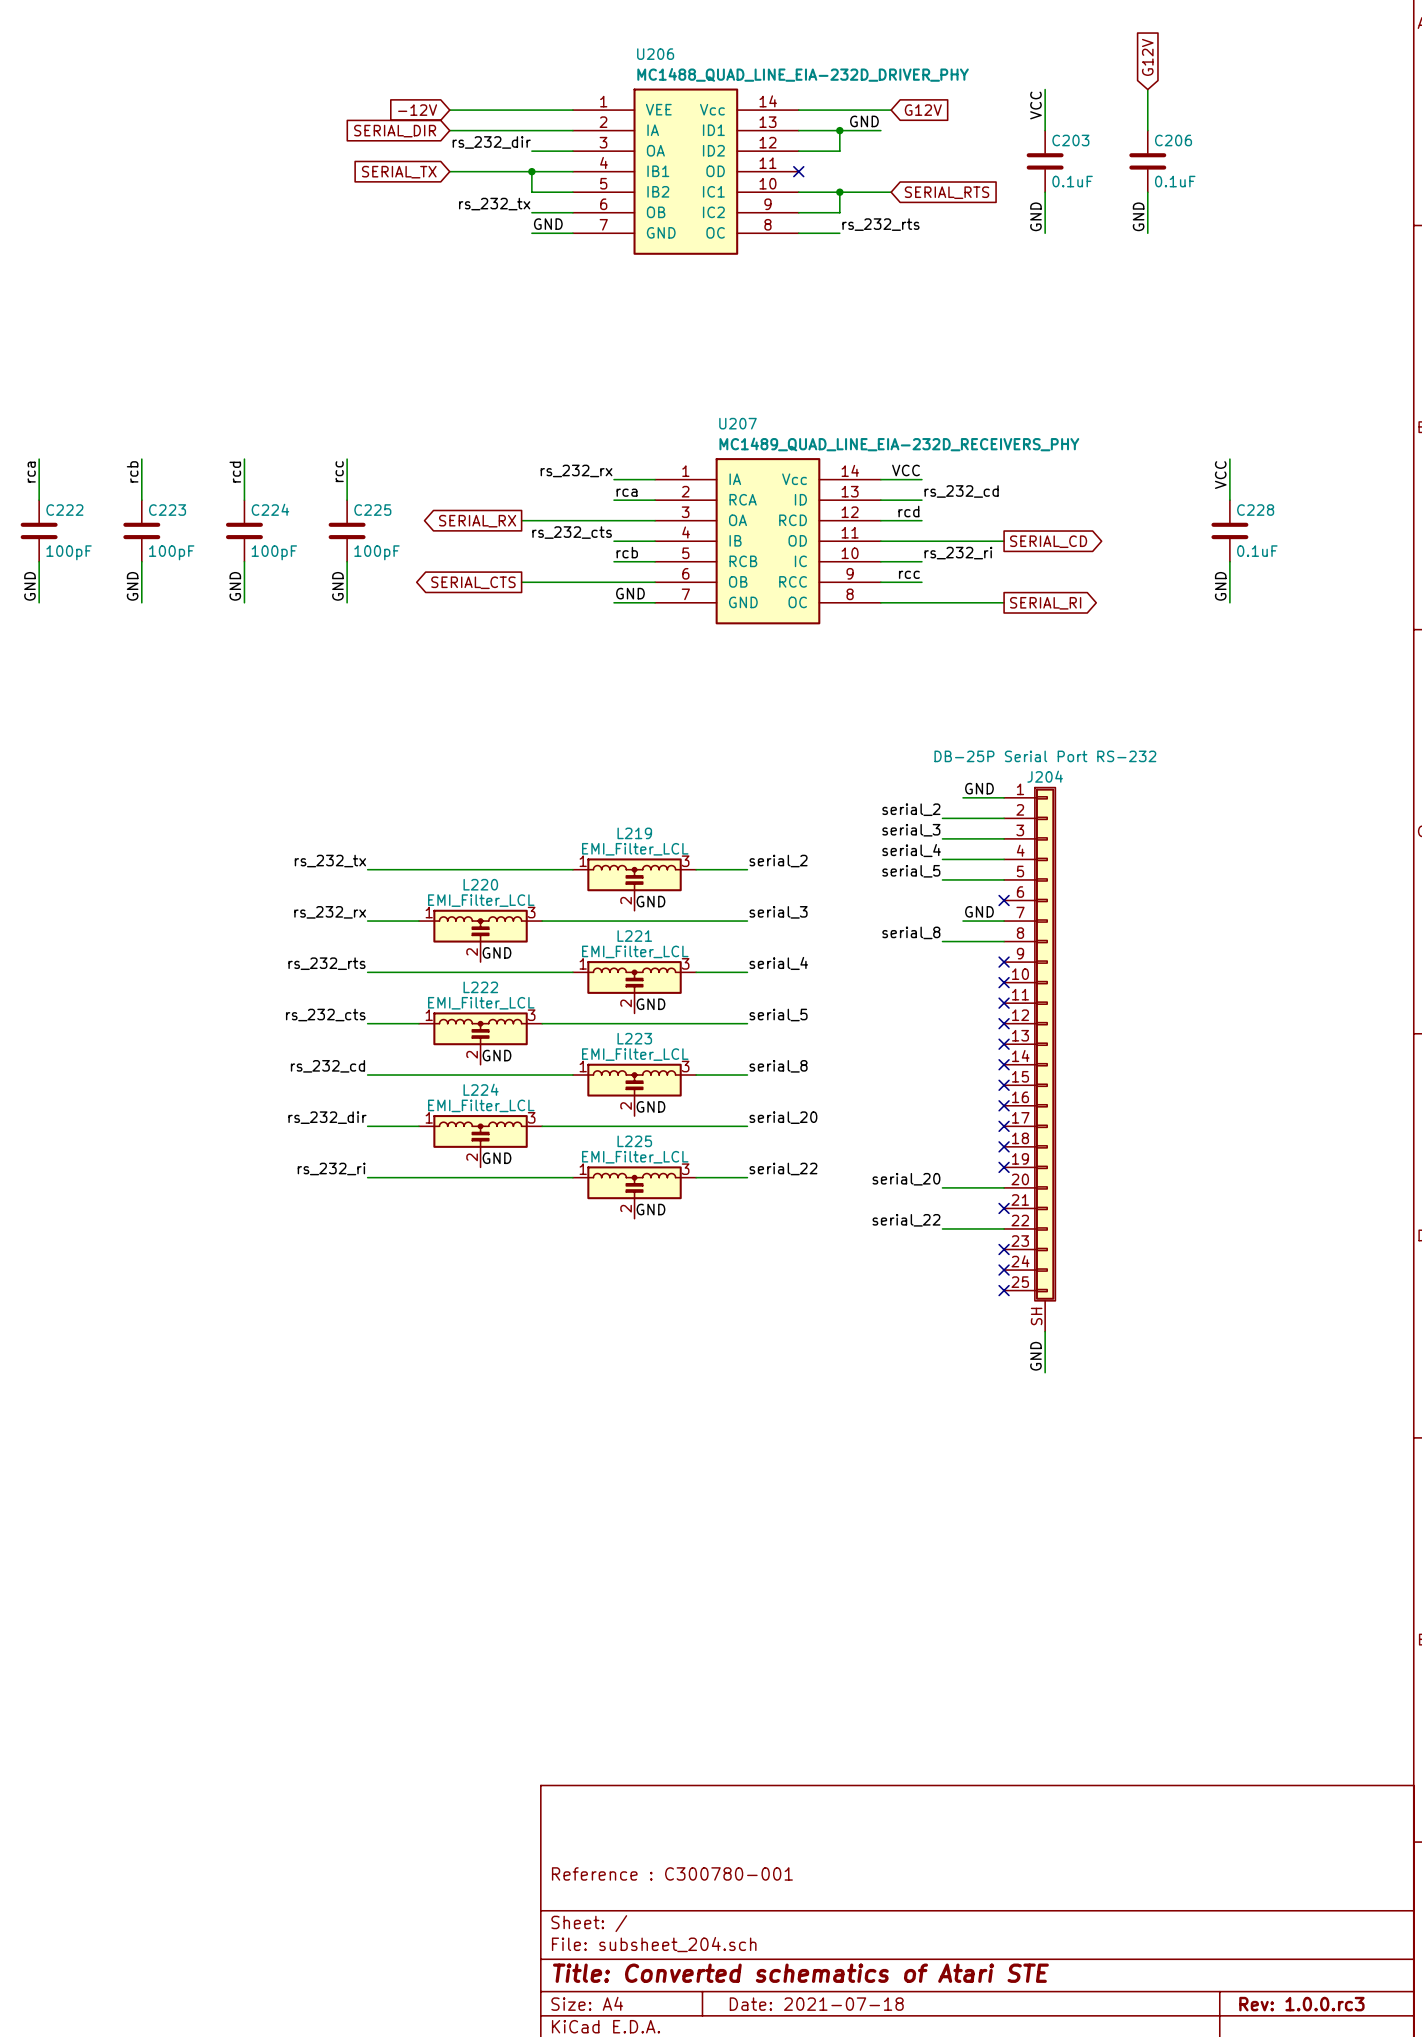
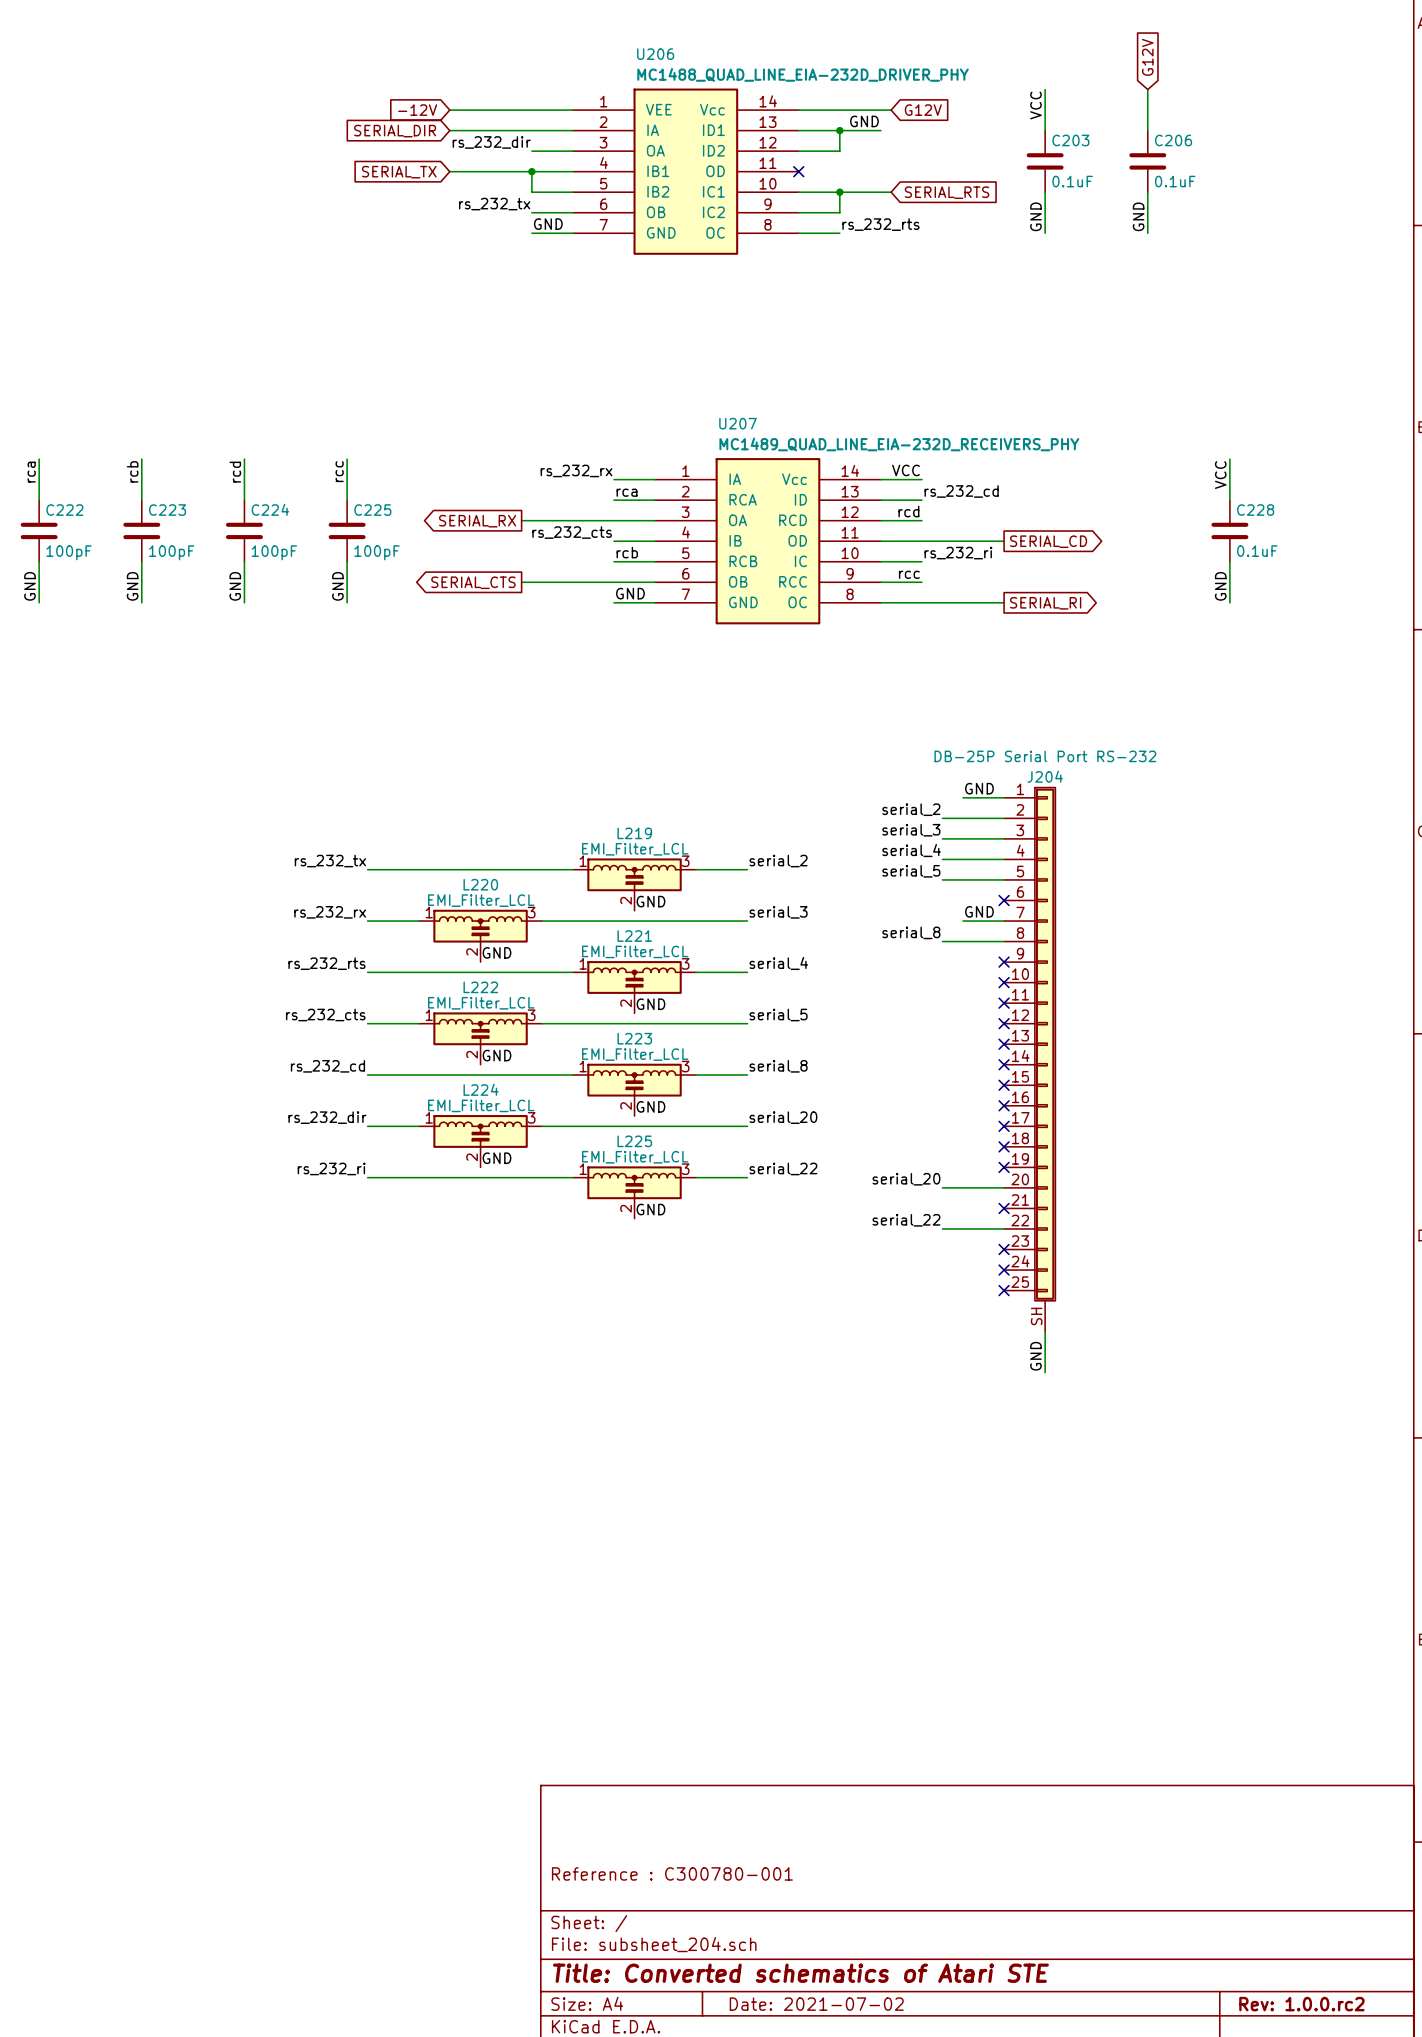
title block: Date: 2021-07-18 (816, 2004) -> Date: 2021-07-02 (816, 2004)
title block: Rev: 1.0.0.rc3 (1301, 2004) -> Rev: 1.0.0.rc2 (1301, 2004)

